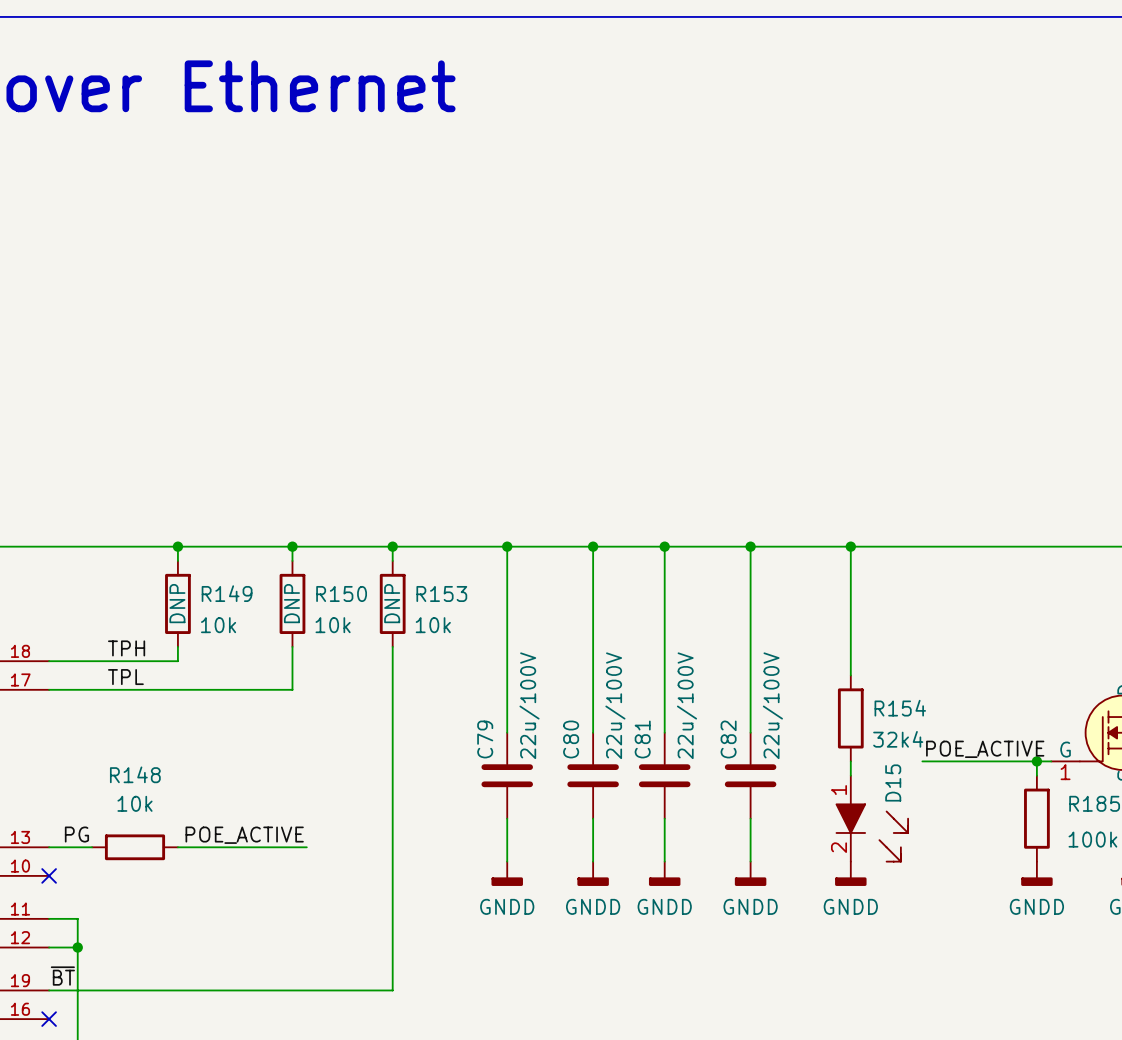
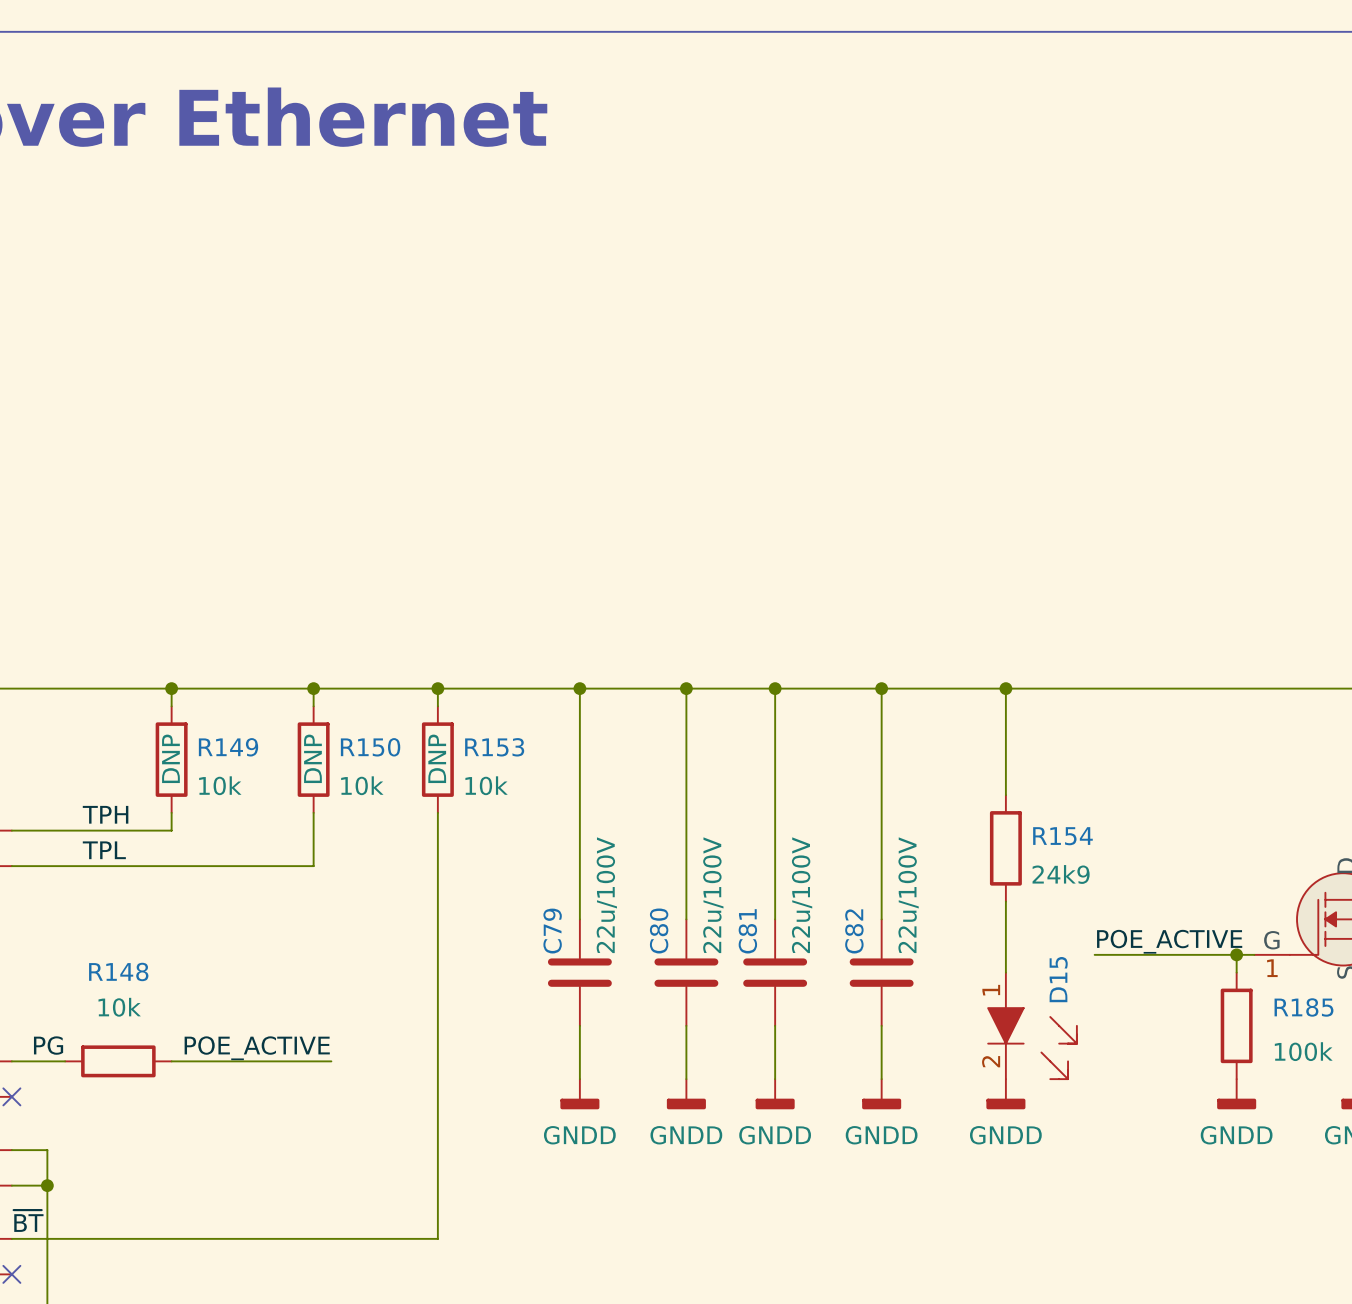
wire: (850, 632) (850, 675) -> (1005, 901) (1005, 954)
R154 position: (850, 718) -> (1005, 848)
R154 text: 32k4 (898, 739) -> 24k9 (1061, 874)

